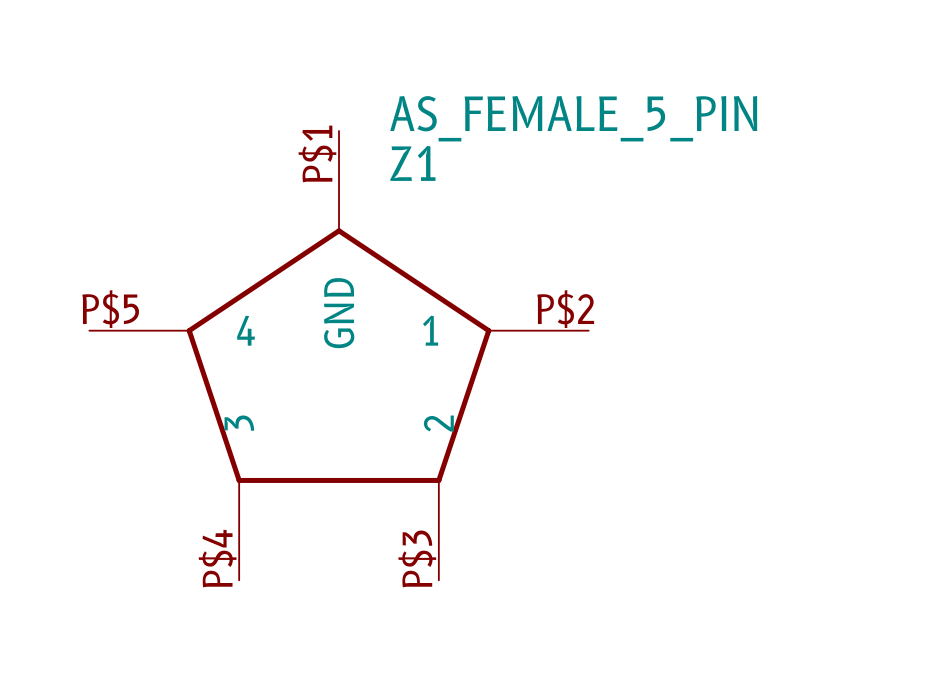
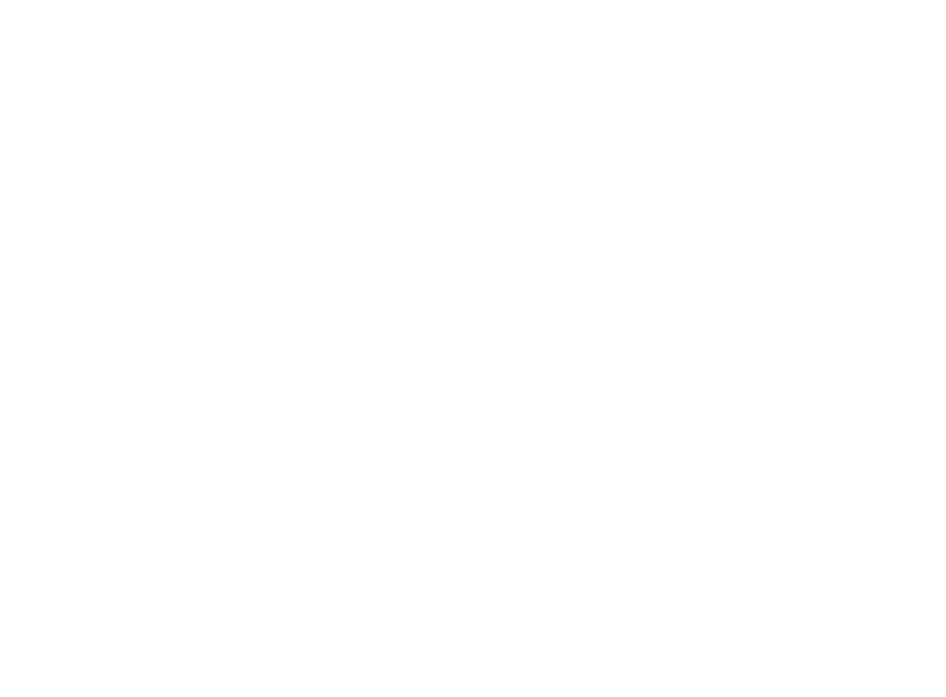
Z1: AS_FEMALE_5_PIN (339, 355) -> none

